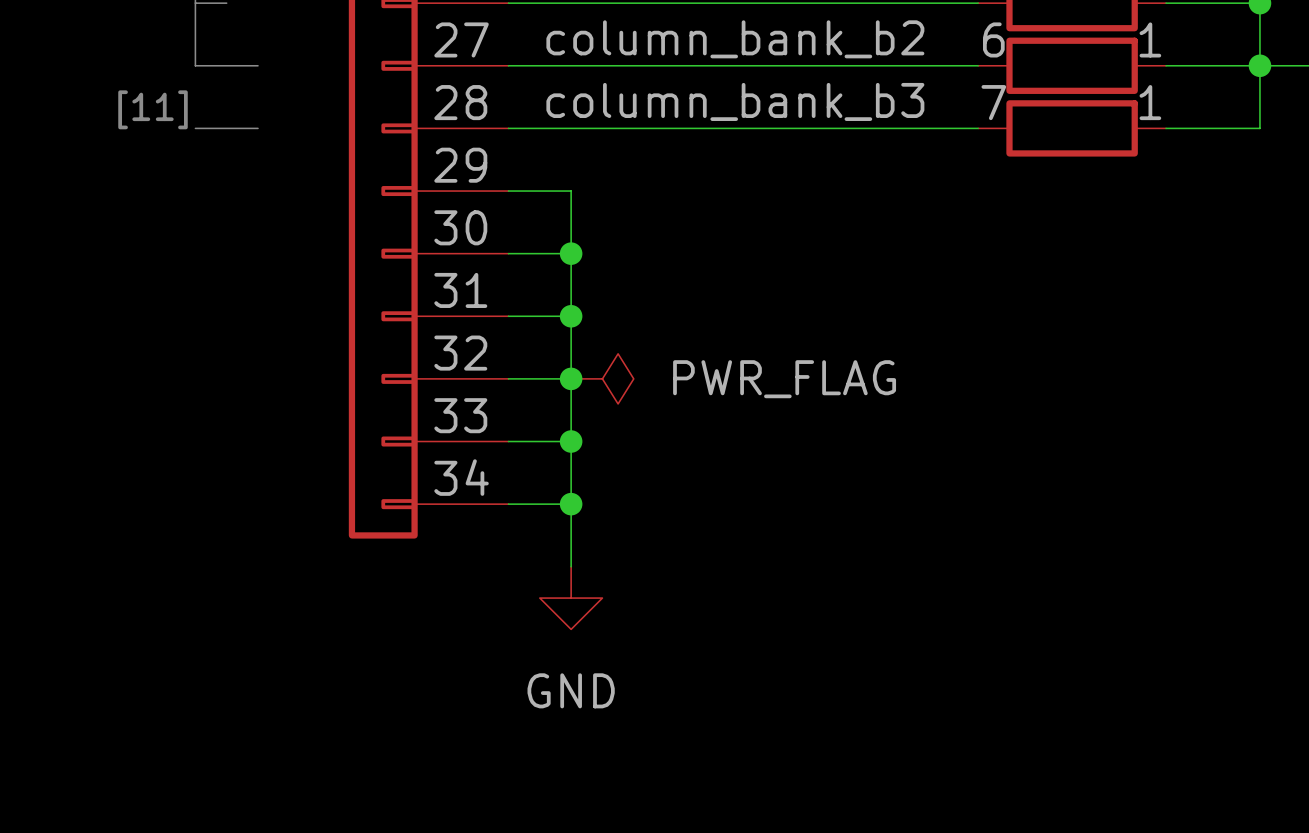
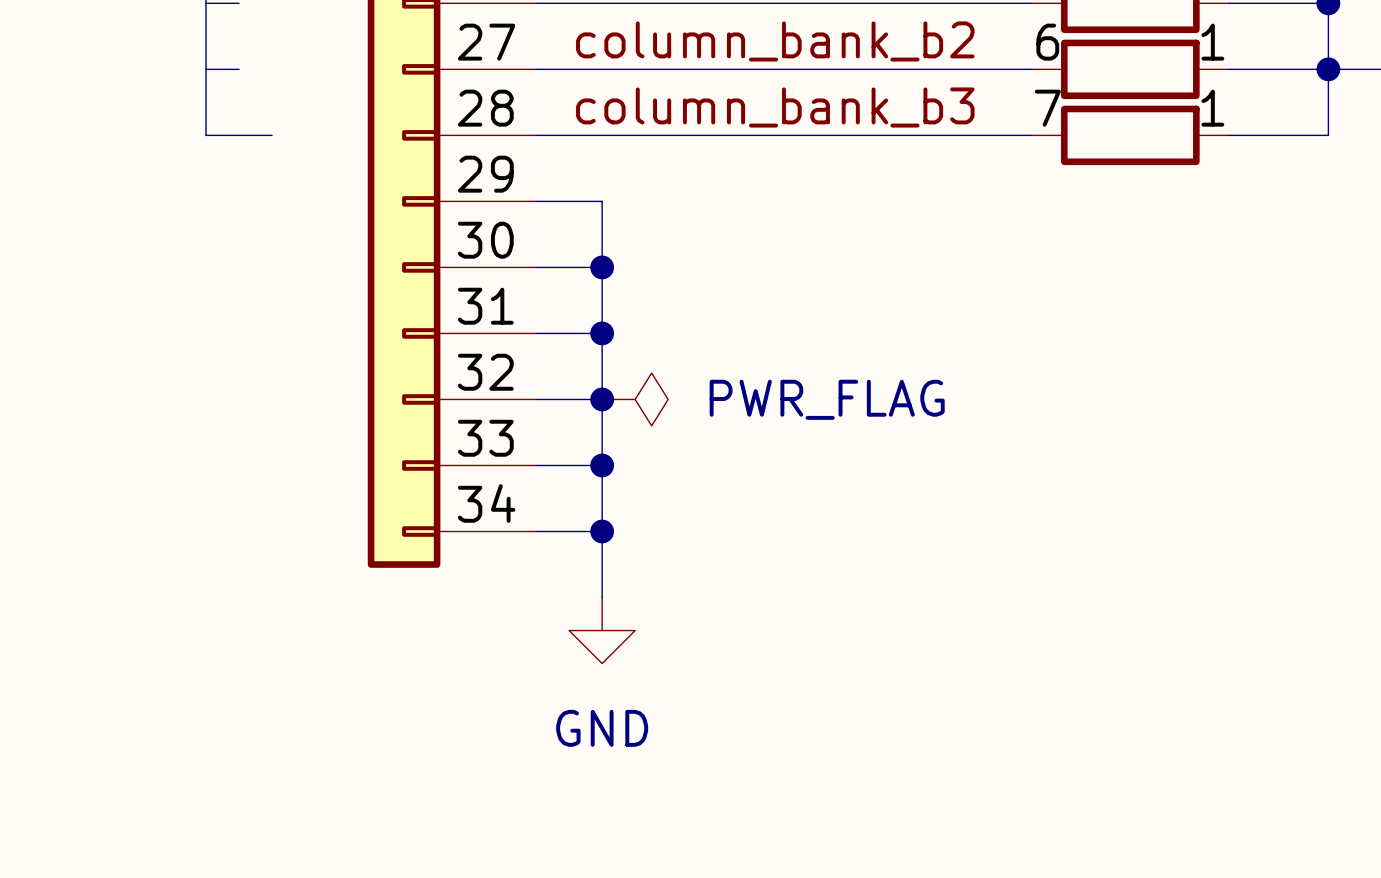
line: none -> (206, 69) (206, 135)
line: (226, 65) (258, 65) -> none
text: [11] (153, 109) -> none

